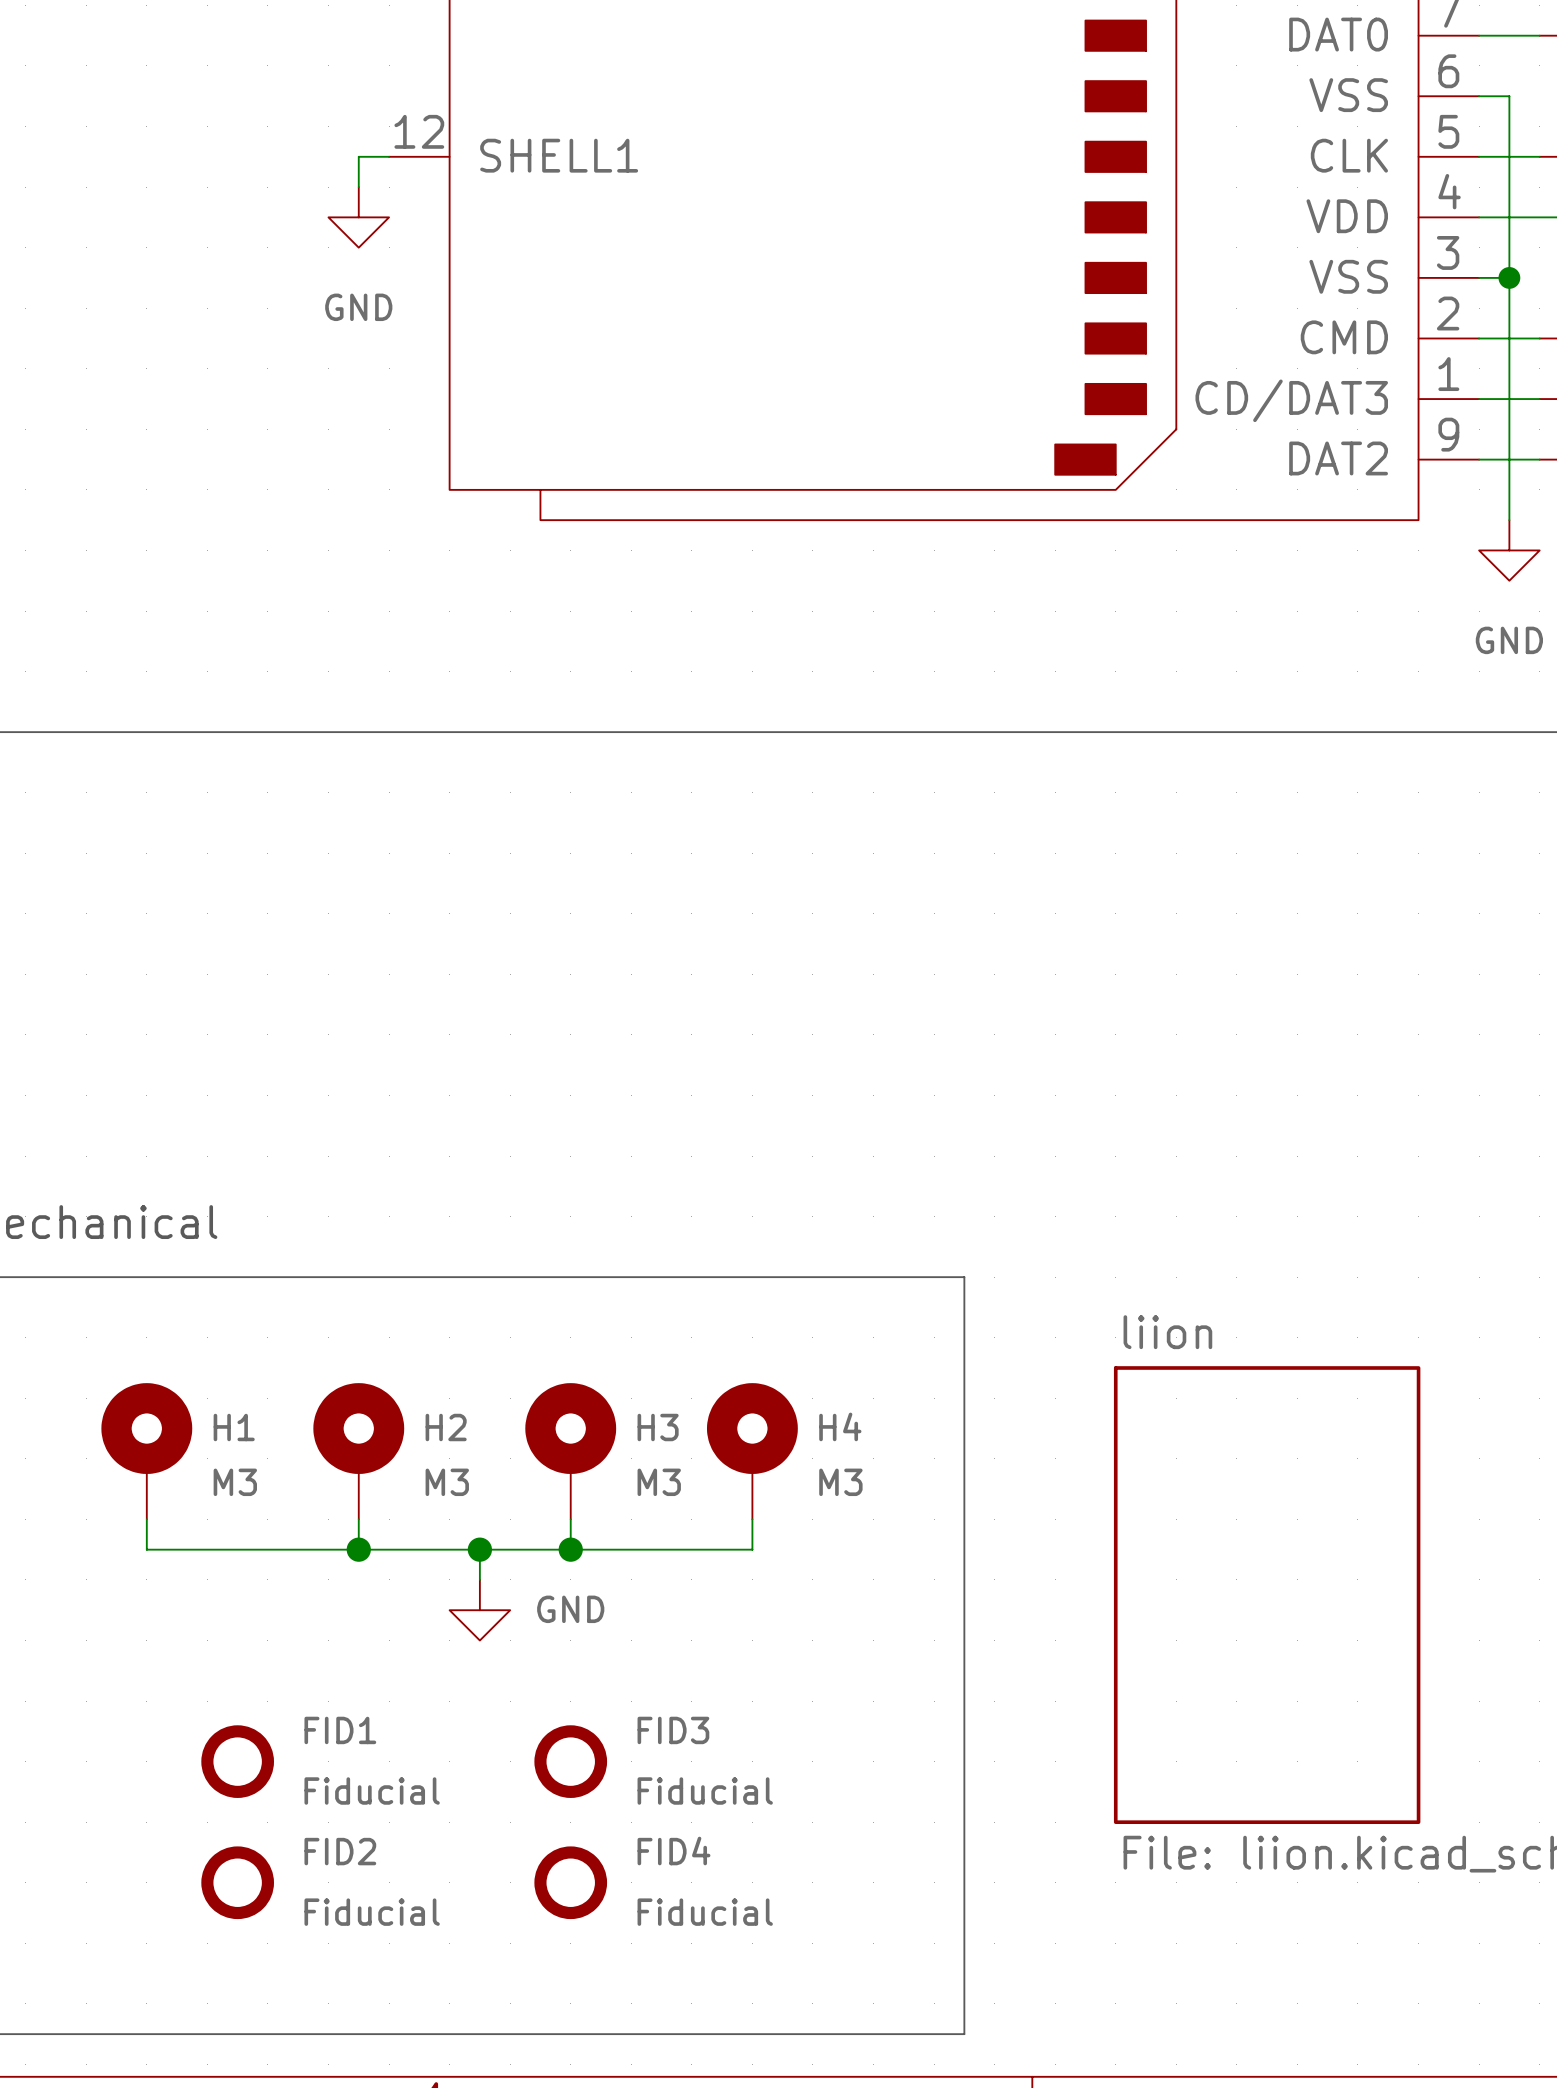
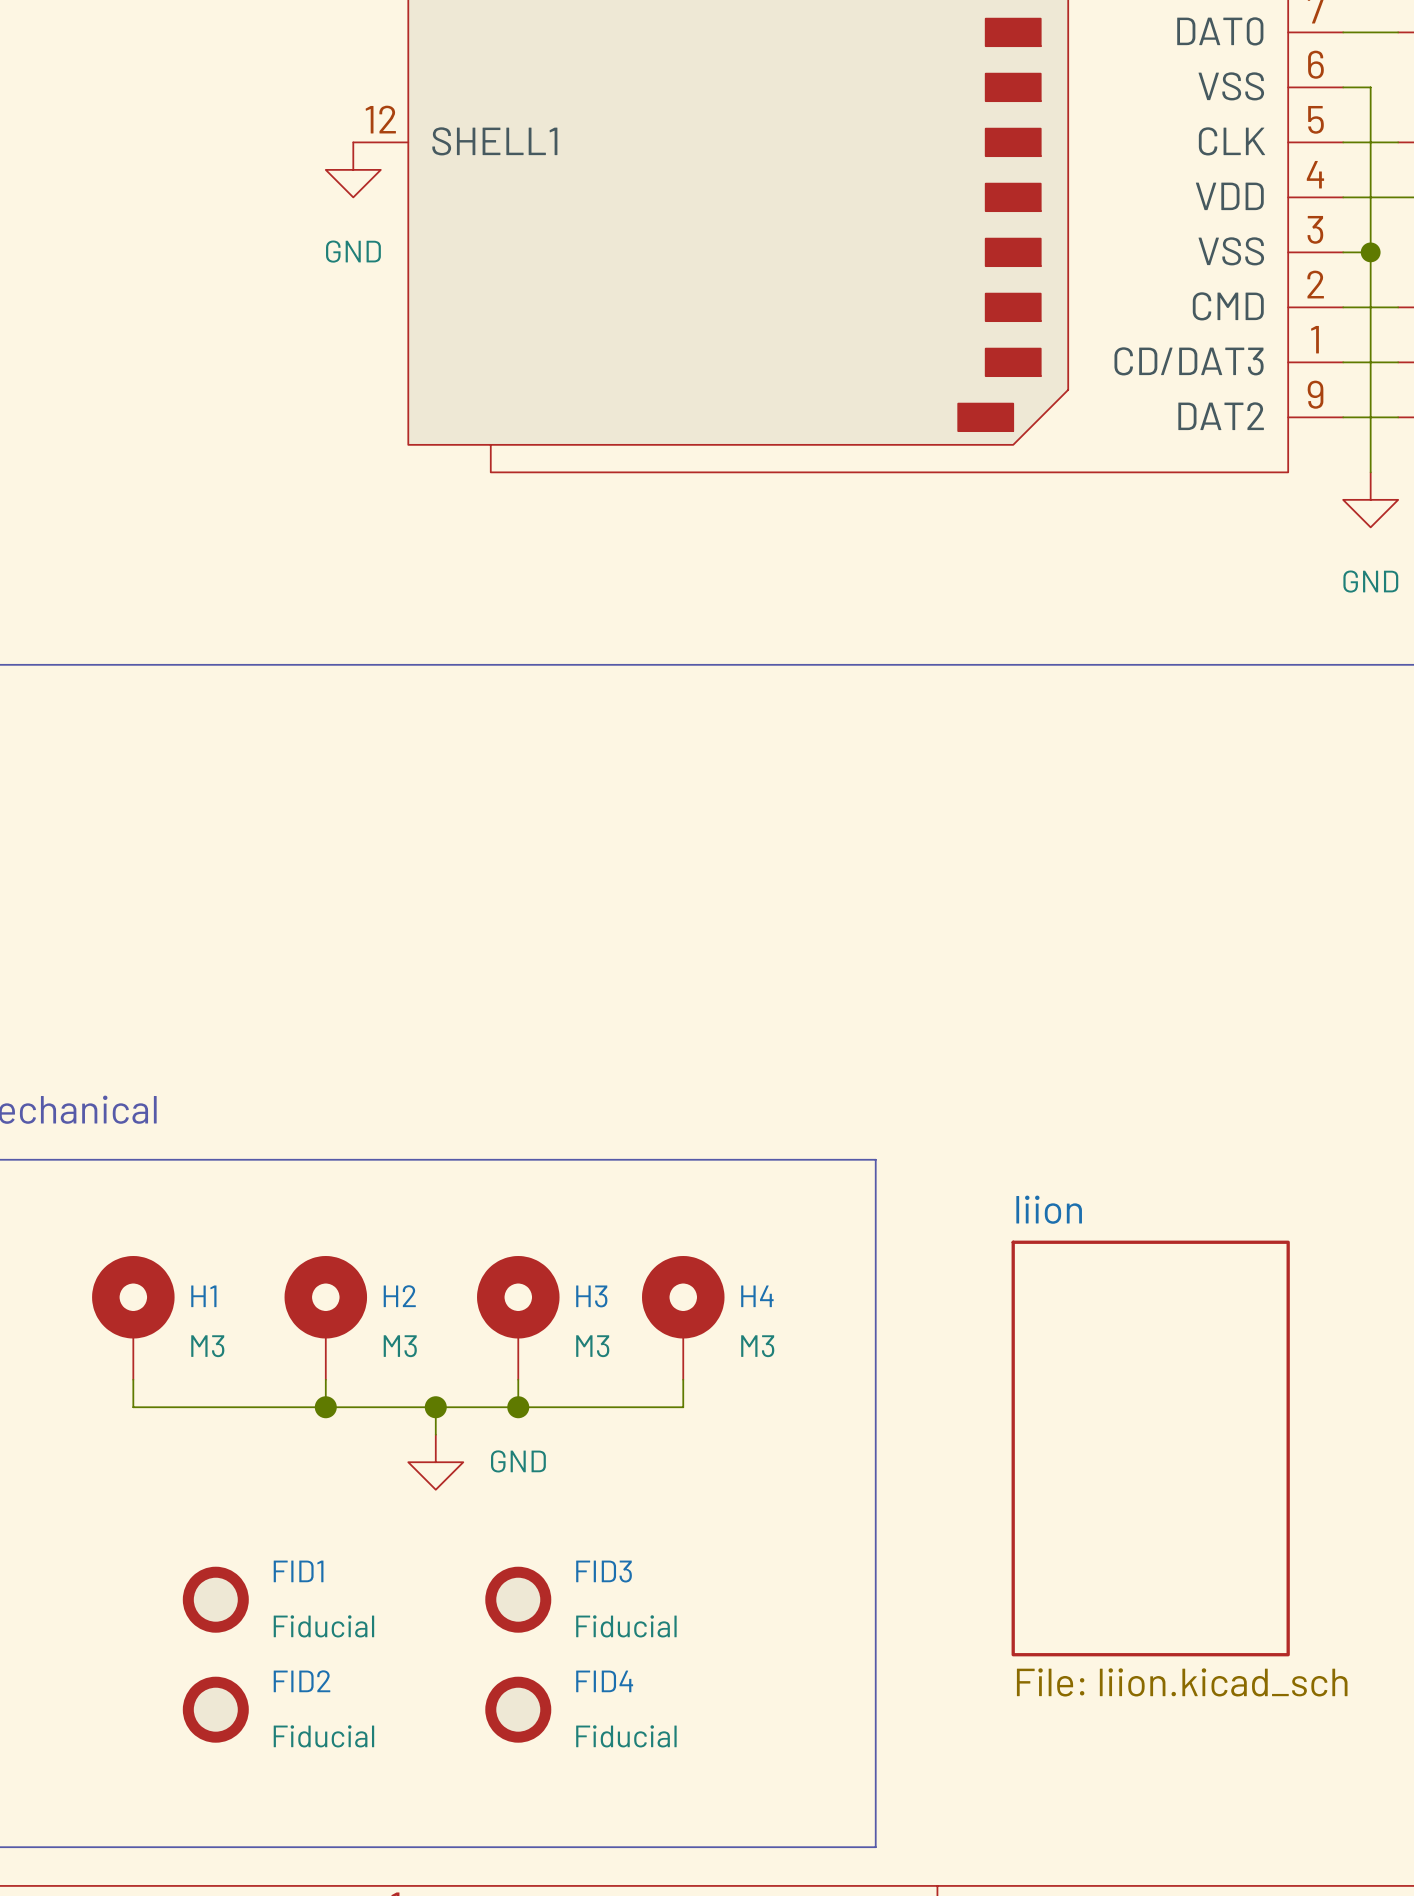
wire: (389, 156) (358, 156) (358, 187) -> none
power symbol position: GND (358, 217) -> GND (353, 169)

